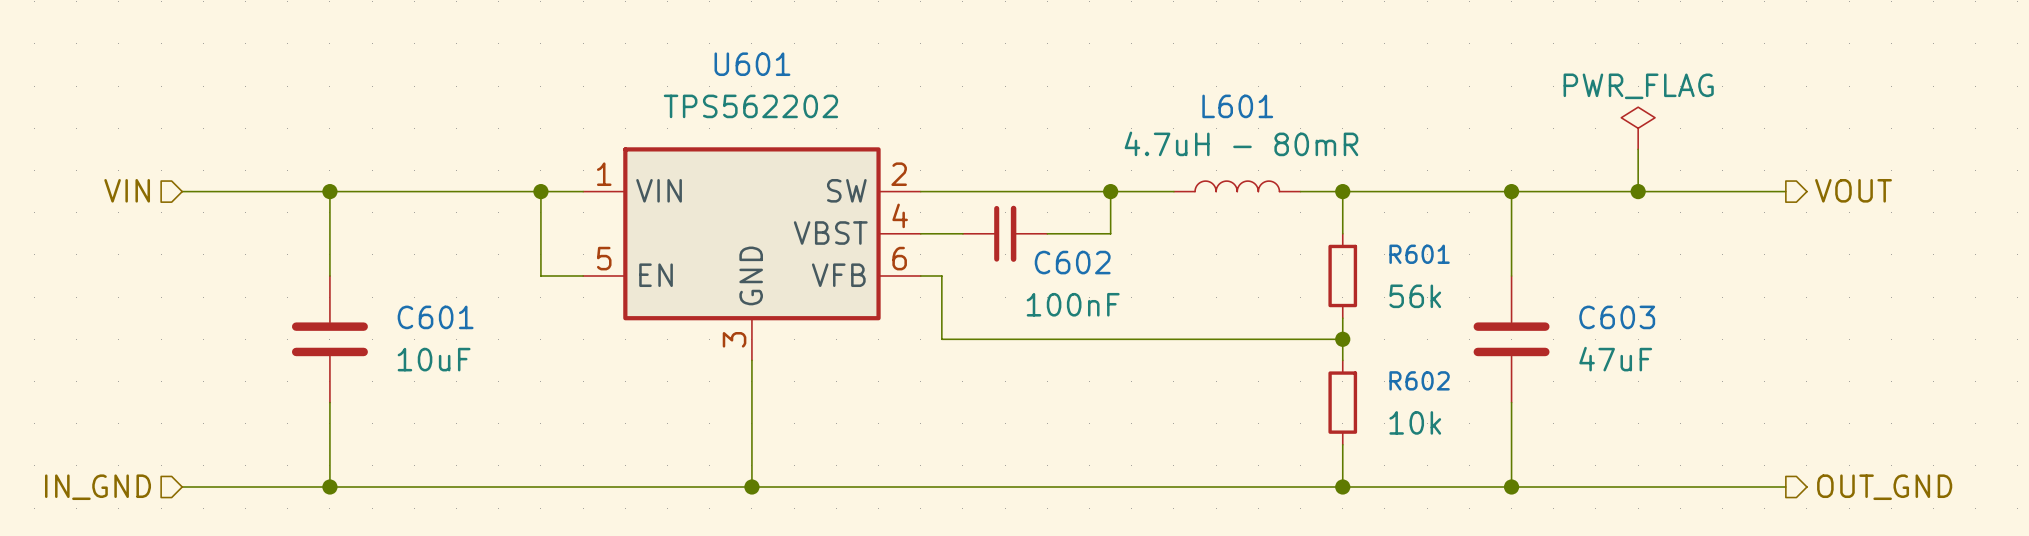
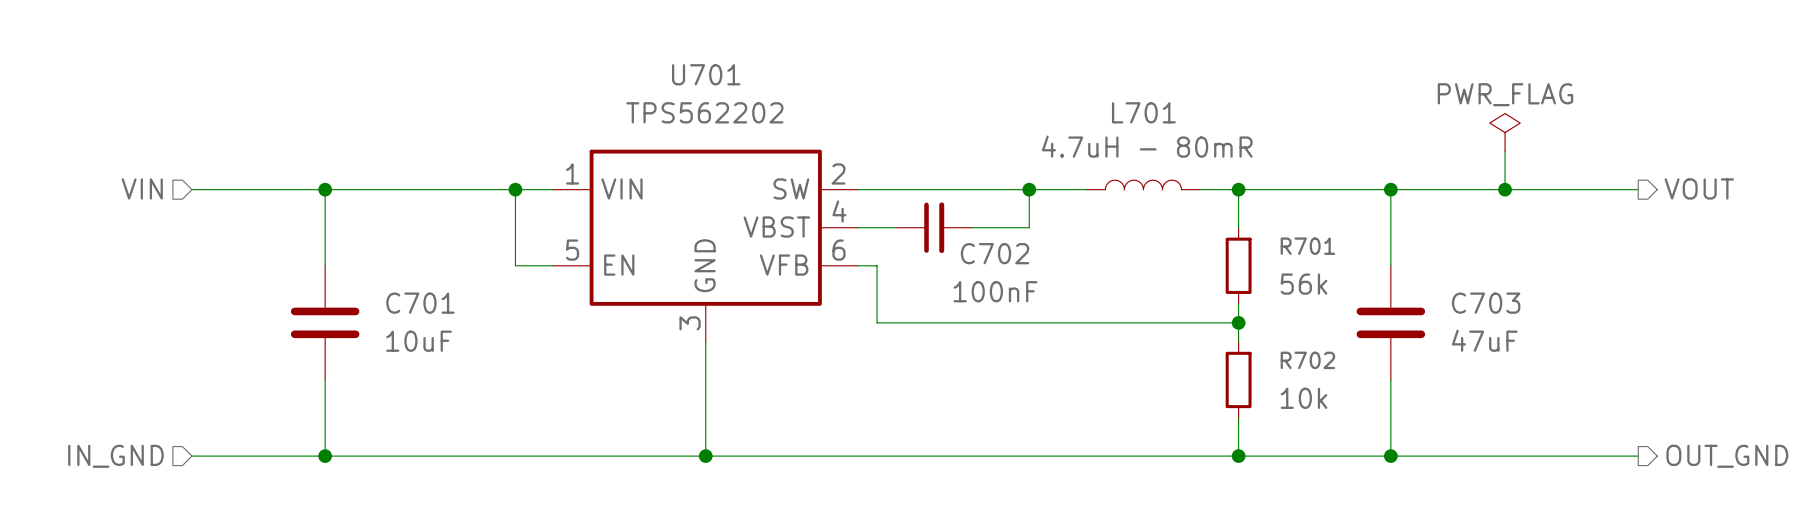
U601 name: U601 (752, 64) -> U701 (706, 74)
L601 name: L601 (1237, 106) -> L701 (1143, 112)
R601 name: R601 (1419, 254) -> R701 (1307, 246)
C602 name: C602 (1072, 262) -> C702 (995, 253)
C601 name: C601 (435, 317) -> C701 (420, 303)
C603 name: C603 (1617, 317) -> C703 (1486, 303)
R602 name: R602 (1419, 380) -> R702 (1307, 360)

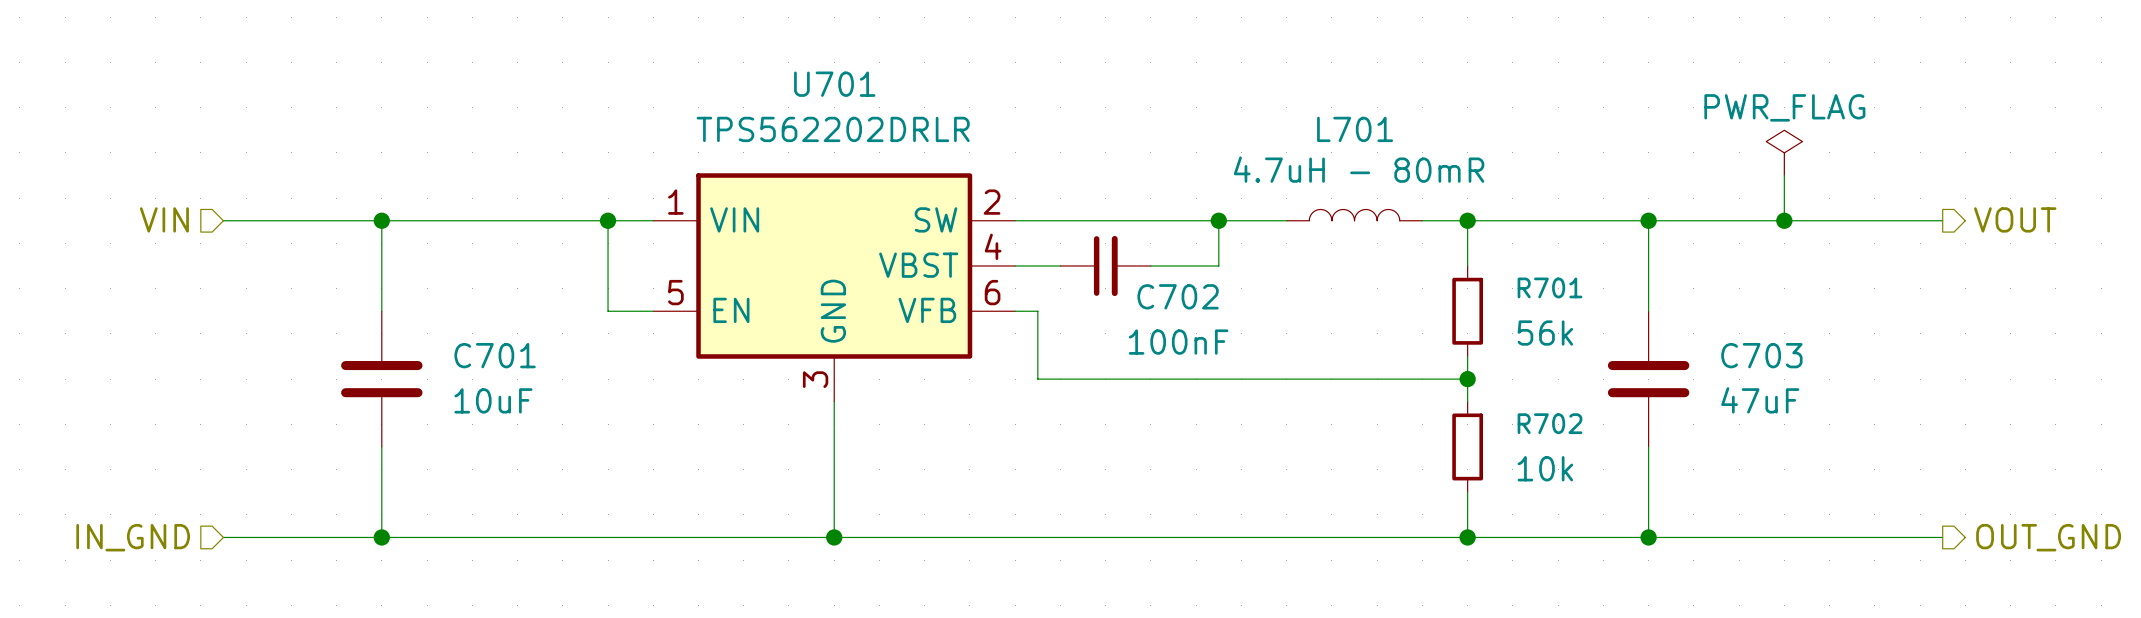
U701 value: TPS562202 (704, 112) -> TPS562202DRLR (833, 129)

